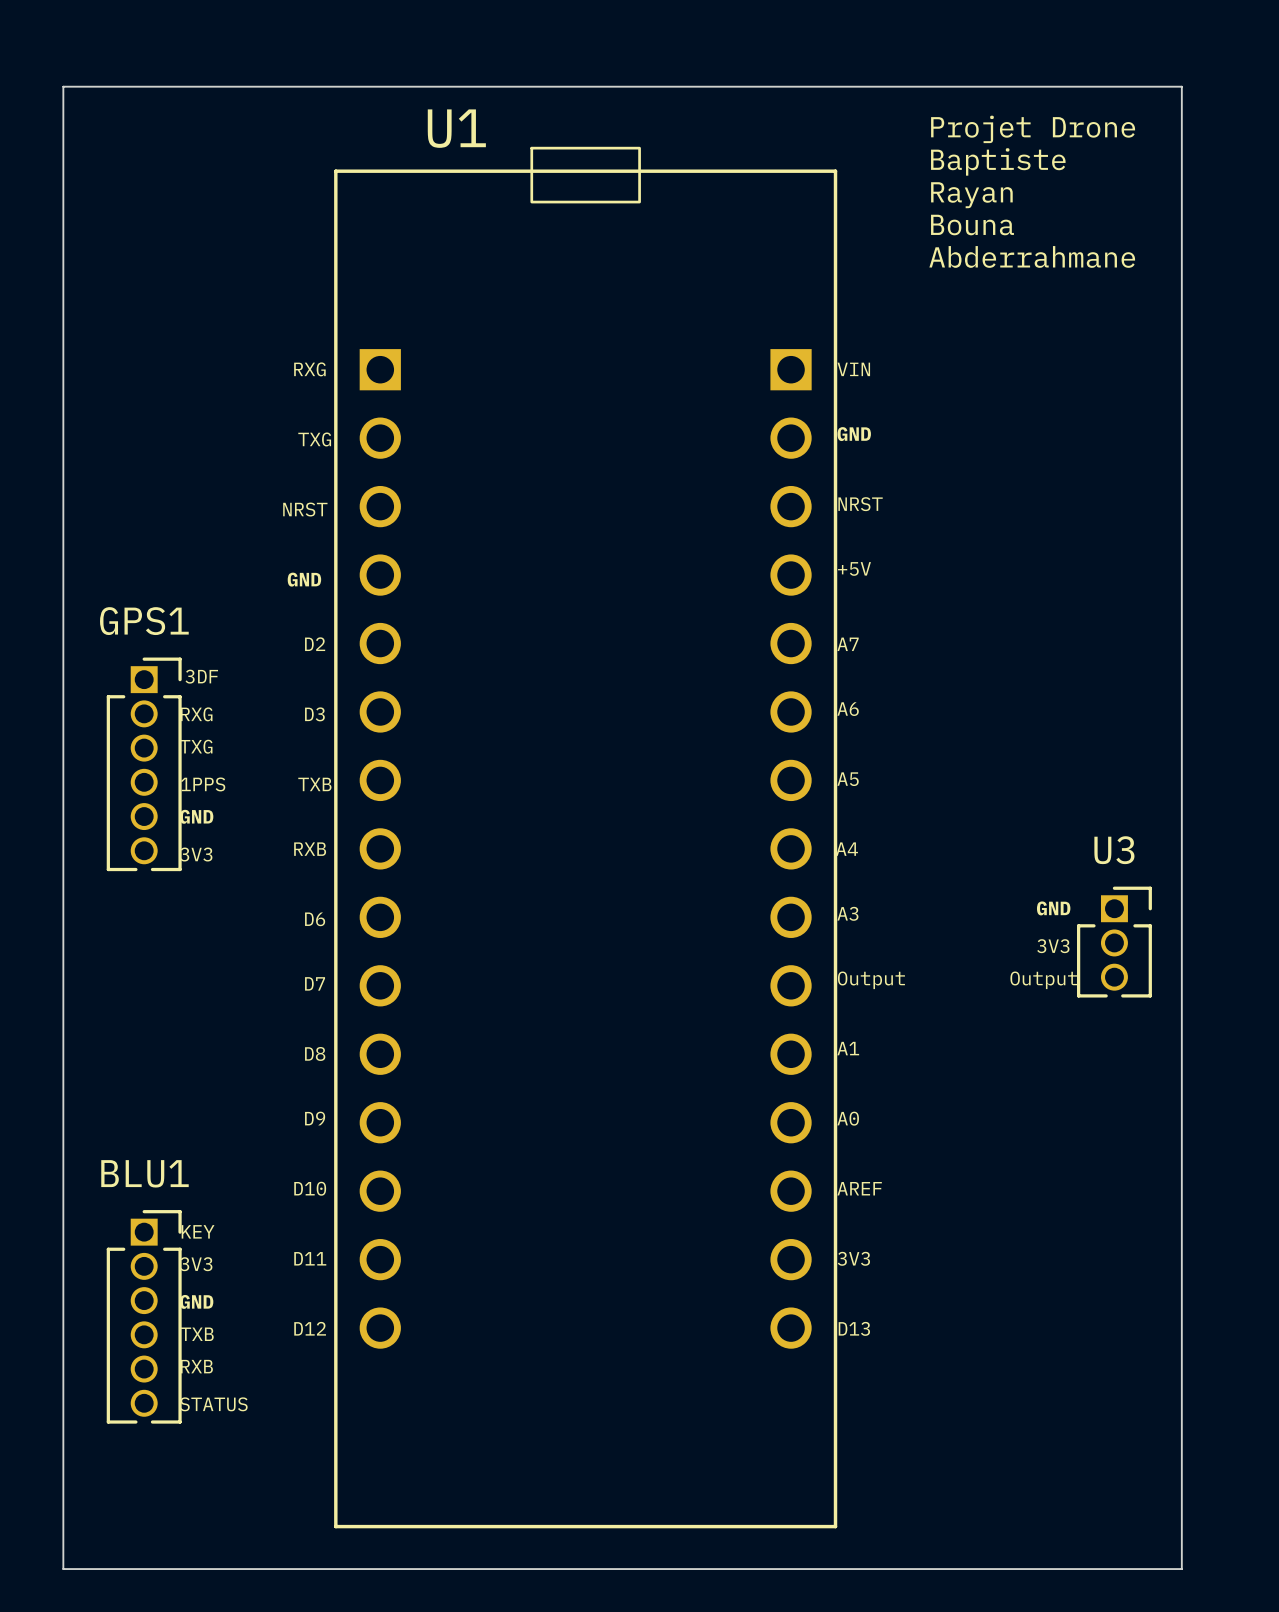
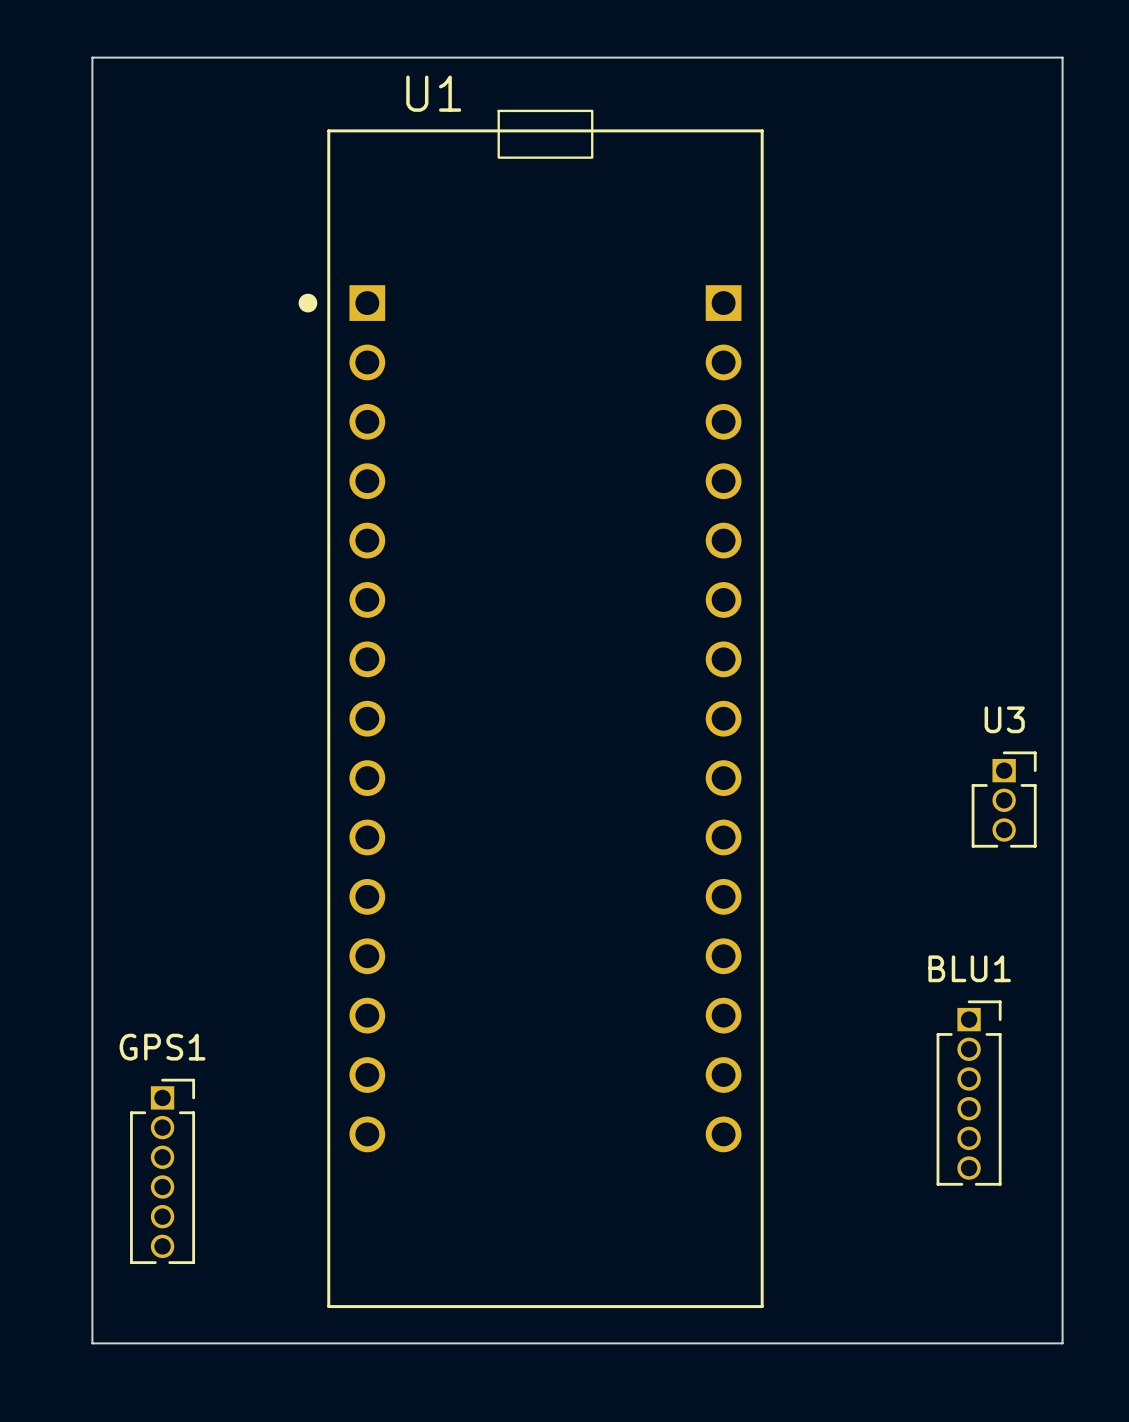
text: Projet Drone (1033, 129) -> none
U1 footprint: [334, 146, 838, 1529] -> [298, 109, 764, 1309]
text: Baptiste (998, 161) -> none
text: Rayan (971, 195) -> none
text: Bouna (972, 225) -> none
text: Abderrahmane (1032, 256) -> none
text: RXG (309, 369) -> none
text: VIN (853, 369) -> none
text: GND (854, 434) -> none
text: TXG (314, 439) -> none
text: NRST (860, 504) -> none
text: NRST (305, 509) -> none
text: +5V (854, 568) -> none
text: GND (304, 579) -> none
text: D2 (315, 644) -> none
text: A7 (848, 644) -> none
text: 3DF (201, 676) -> none
text: A6 (848, 709) -> none
text: RXG (196, 714) -> none
text: D3 (314, 714) -> none
text: TXG (196, 746) -> none
GPS1 position: (144, 764) -> (162, 1171)
text: A5 (848, 779) -> none
text: 1PPS (203, 784) -> none
text: TXB (314, 784) -> none
text: GND (196, 816) -> none
text: RXB (310, 849) -> none
text: A4 (847, 849) -> none
text: 3V3 (196, 854) -> none
text: GND (1053, 908) -> none
text: A3 (847, 913) -> none
text: D6 (315, 919) -> none
text: 3V3 (1053, 946) -> none
text: Output (871, 980) -> none
text: Output (1043, 980) -> none
text: D7 (315, 983) -> none
text: A1 (848, 1048) -> none
text: D8 (315, 1053) -> none
text: D9 (315, 1118) -> none
text: A0 (848, 1118) -> none
text: D10 (310, 1188) -> none
text: AREF (859, 1188) -> none
text: KEY (198, 1231) -> none
text: D11 (310, 1258) -> none
text: 3V3 (853, 1258) -> none
text: 3V3 (196, 1264) -> none
text: GND (196, 1301) -> none
BLU1 position: (144, 1316) -> (969, 1093)
text: D12 (310, 1328) -> none
text: D13 (854, 1328) -> none
text: TXB (197, 1334) -> none
text: RXB (196, 1366) -> none
text: STATUS (213, 1404) -> none

